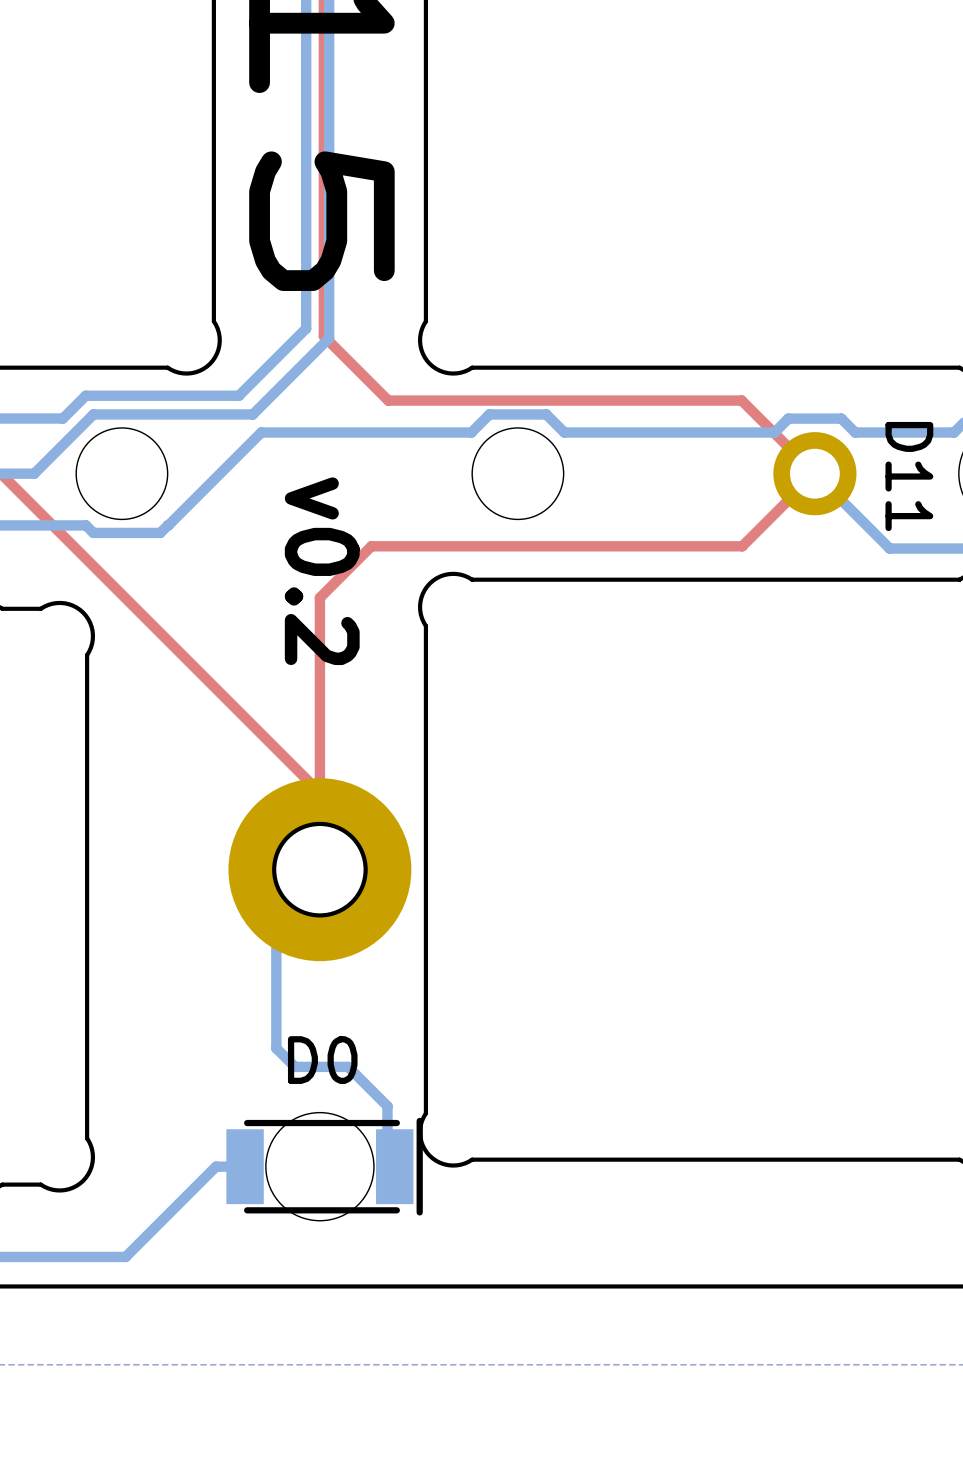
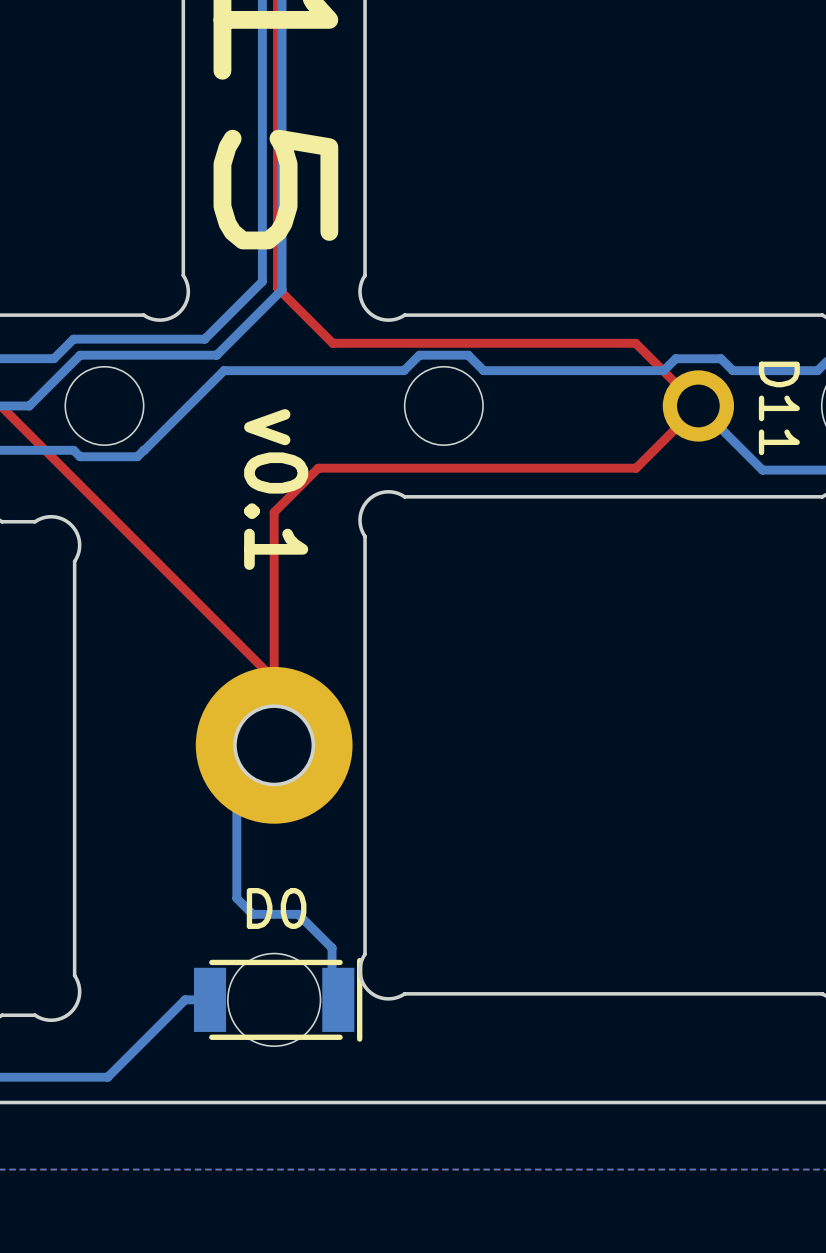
text: v0.2 (322, 571) -> v0.1 (276, 489)

